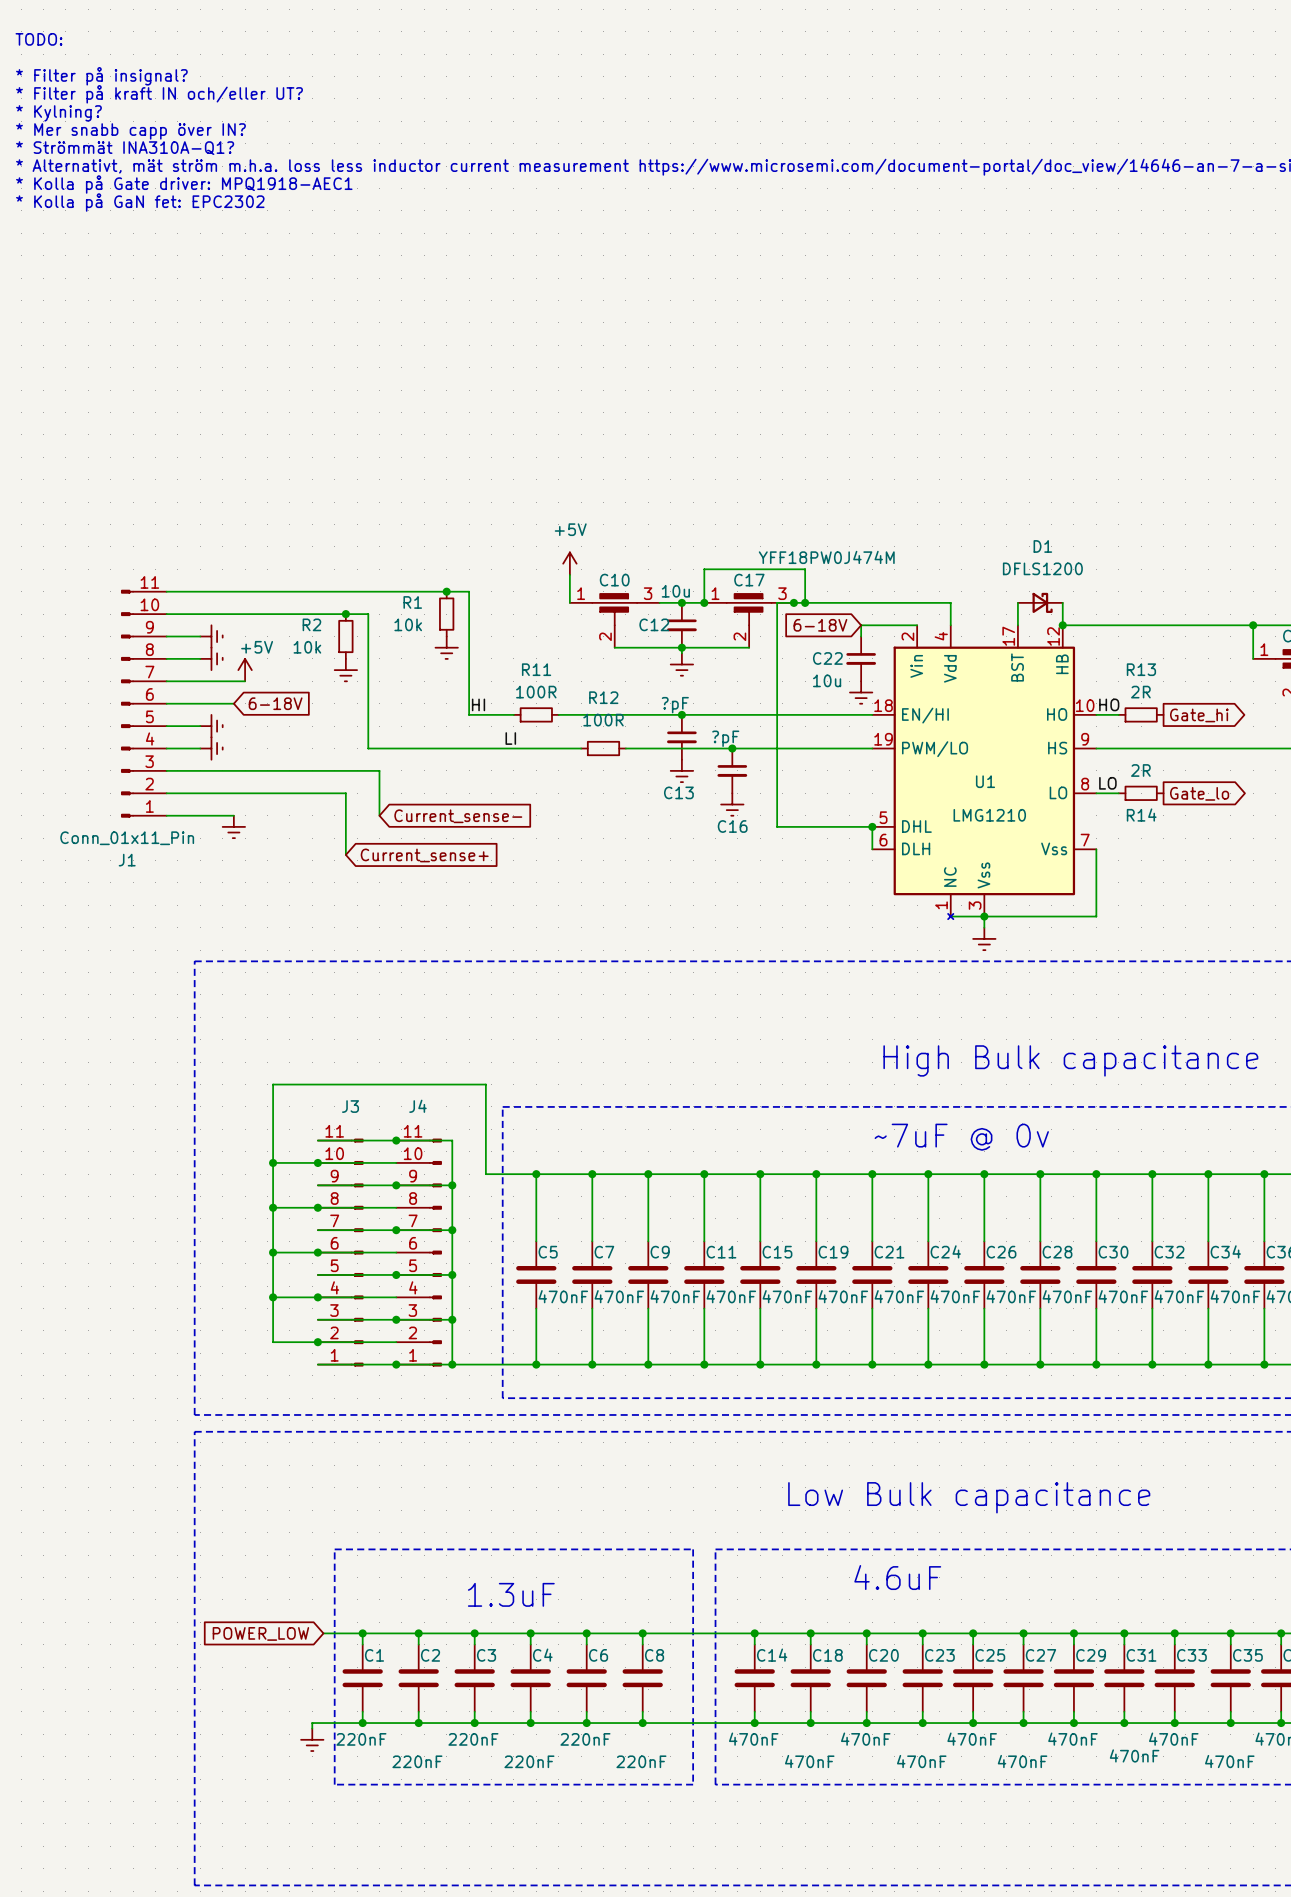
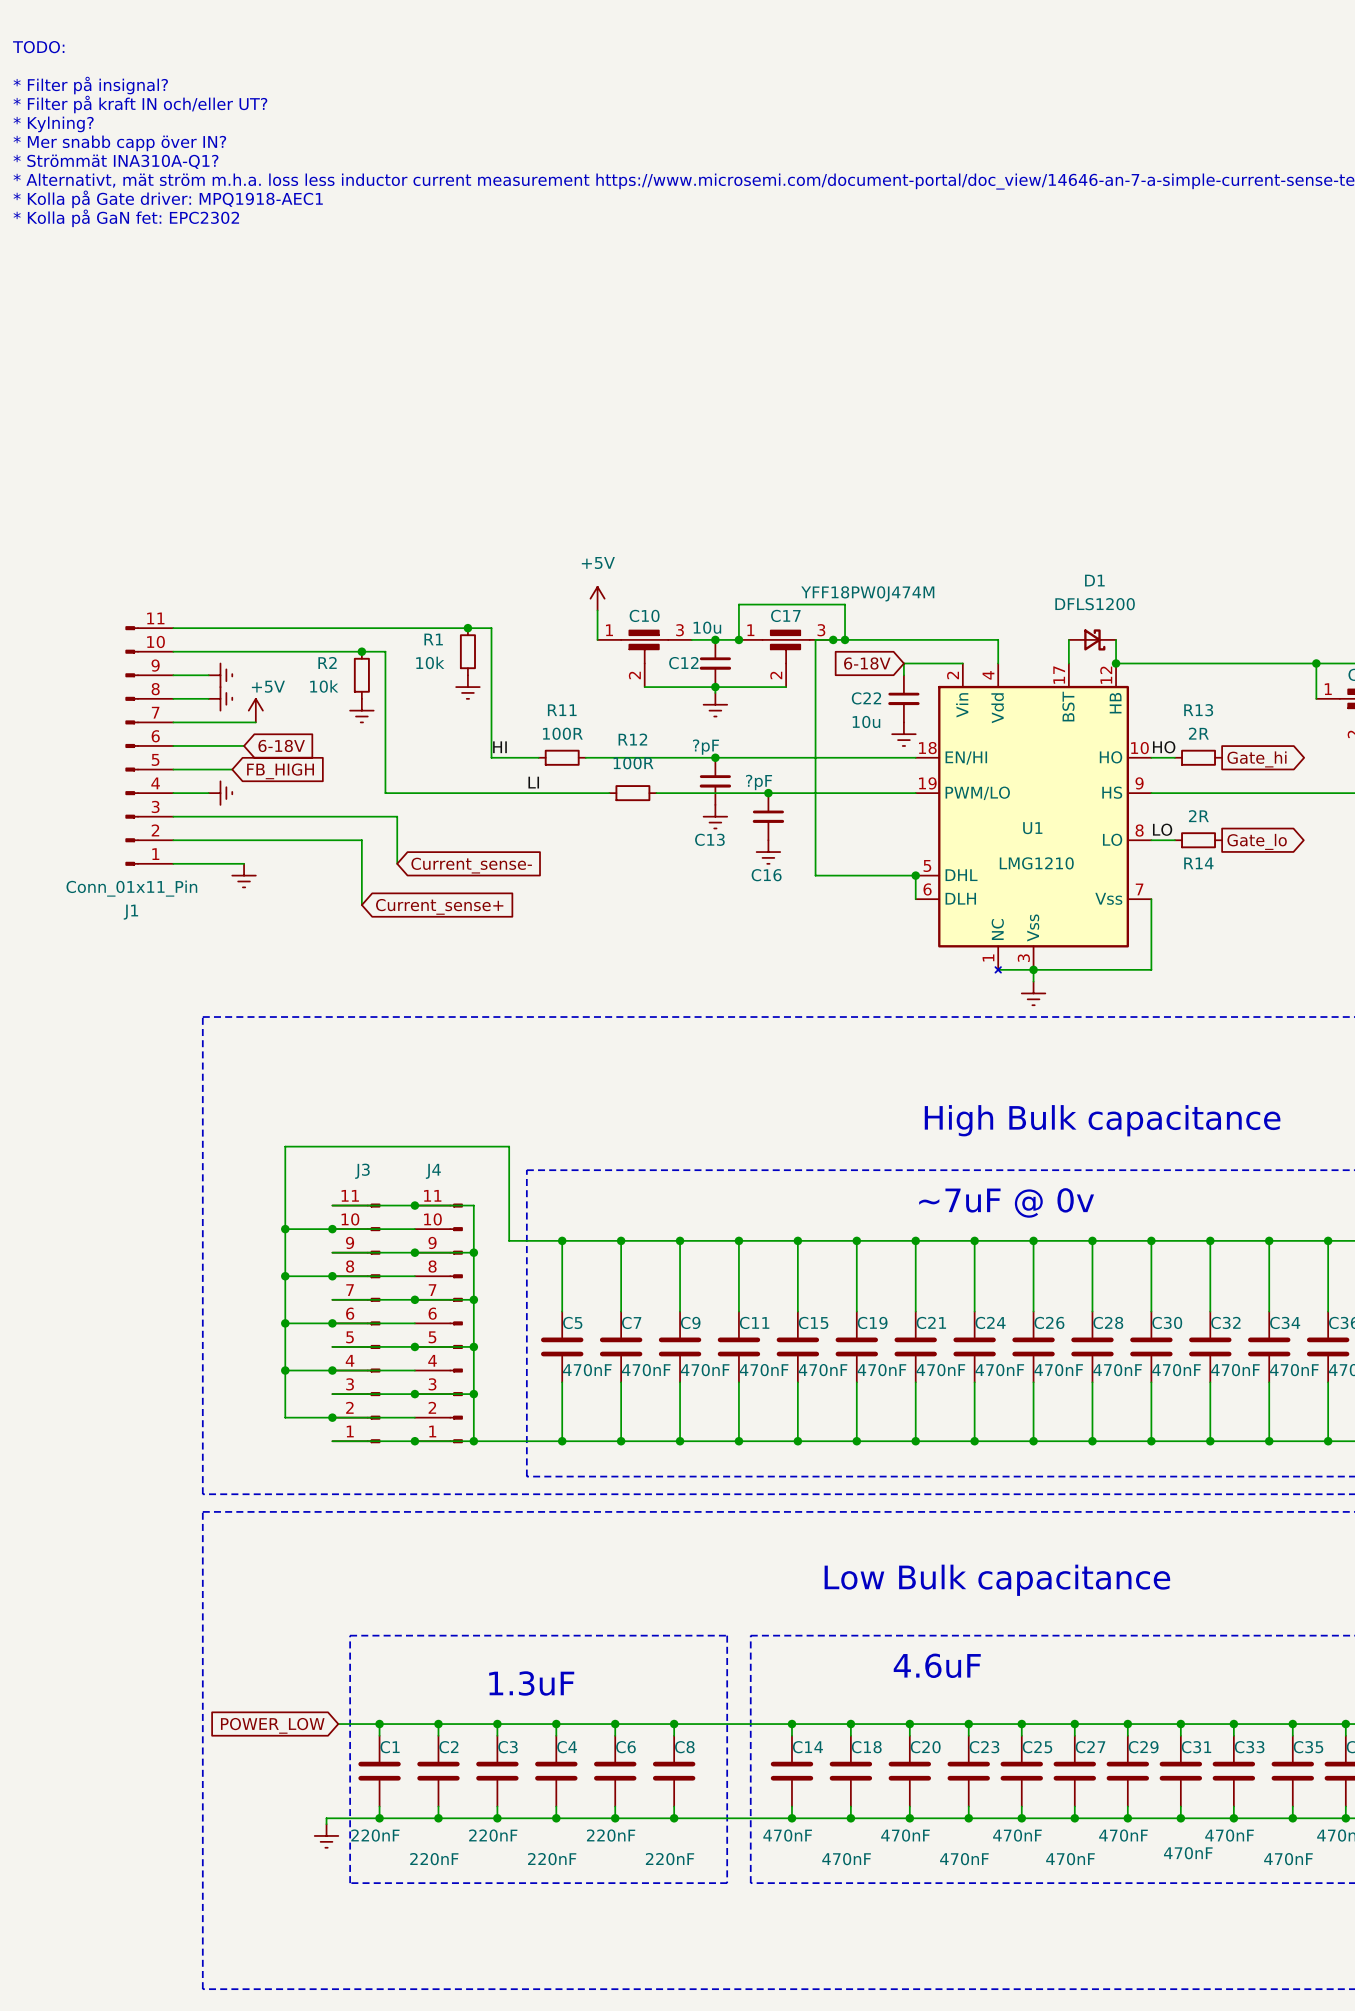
power symbol: (211, 726) -> none
global label: none -> FB_HIGH (280, 771)

